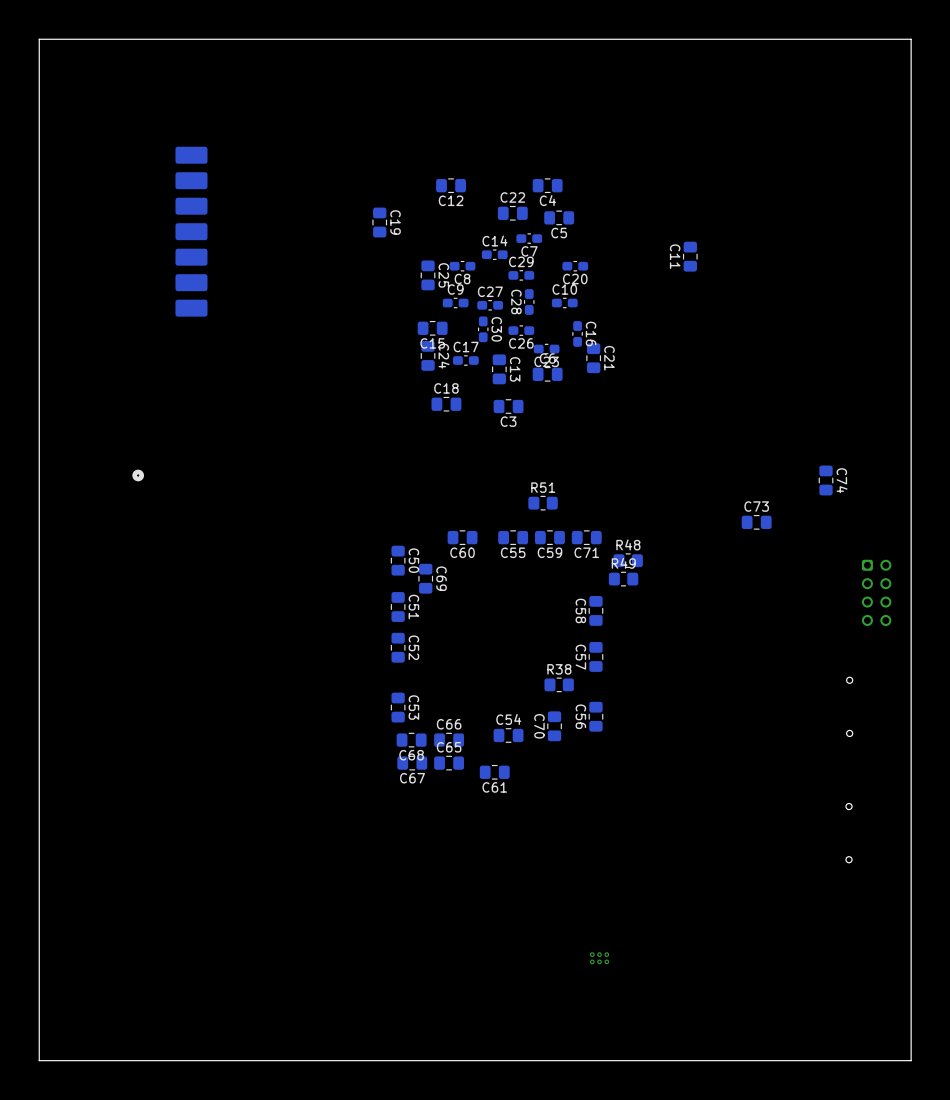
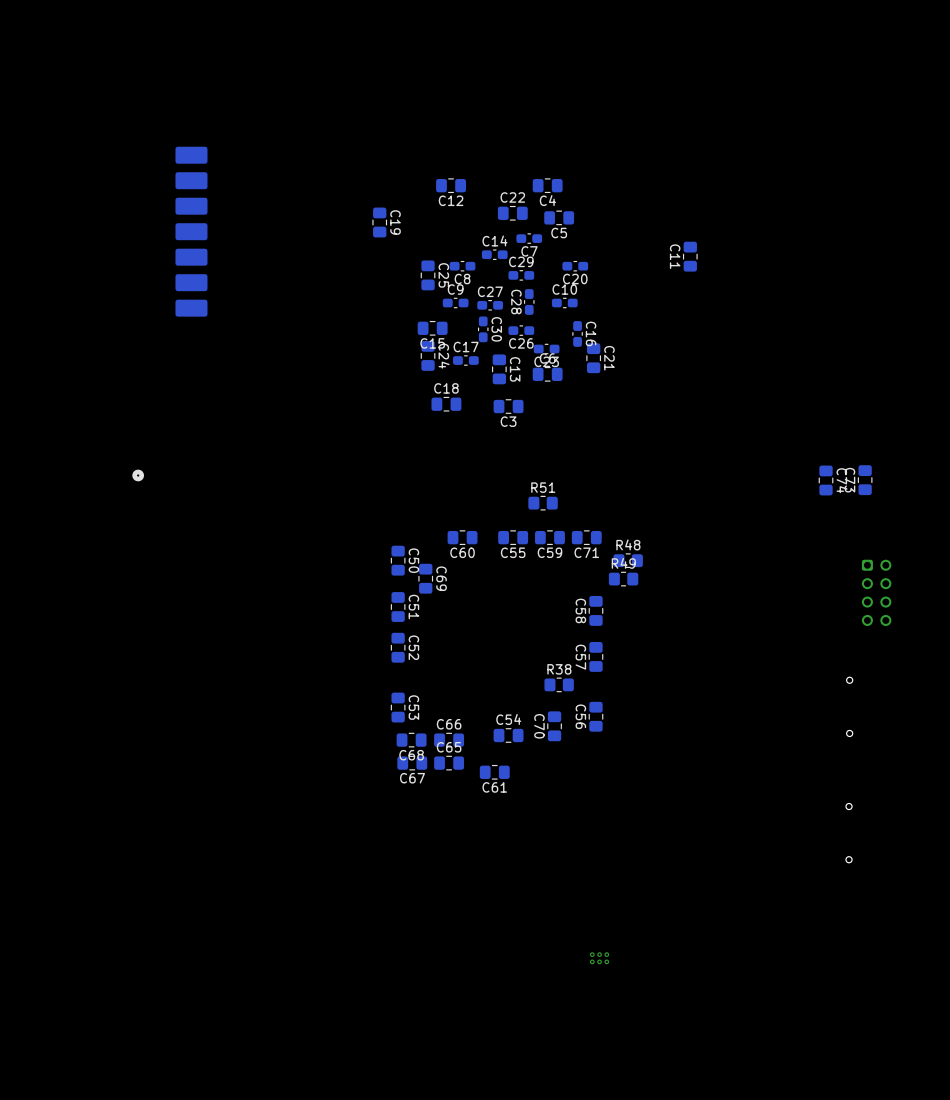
board edge: (911, 39) (39, 39) (39, 1060) (911, 1060) (911, 39) -> none
C73 name position: C73 (756, 506) -> C73 (850, 480)
C73 rotation: 0° (756, 522) -> 90° clockwise (865, 480)
C73 position: (756, 522) -> (865, 480)

